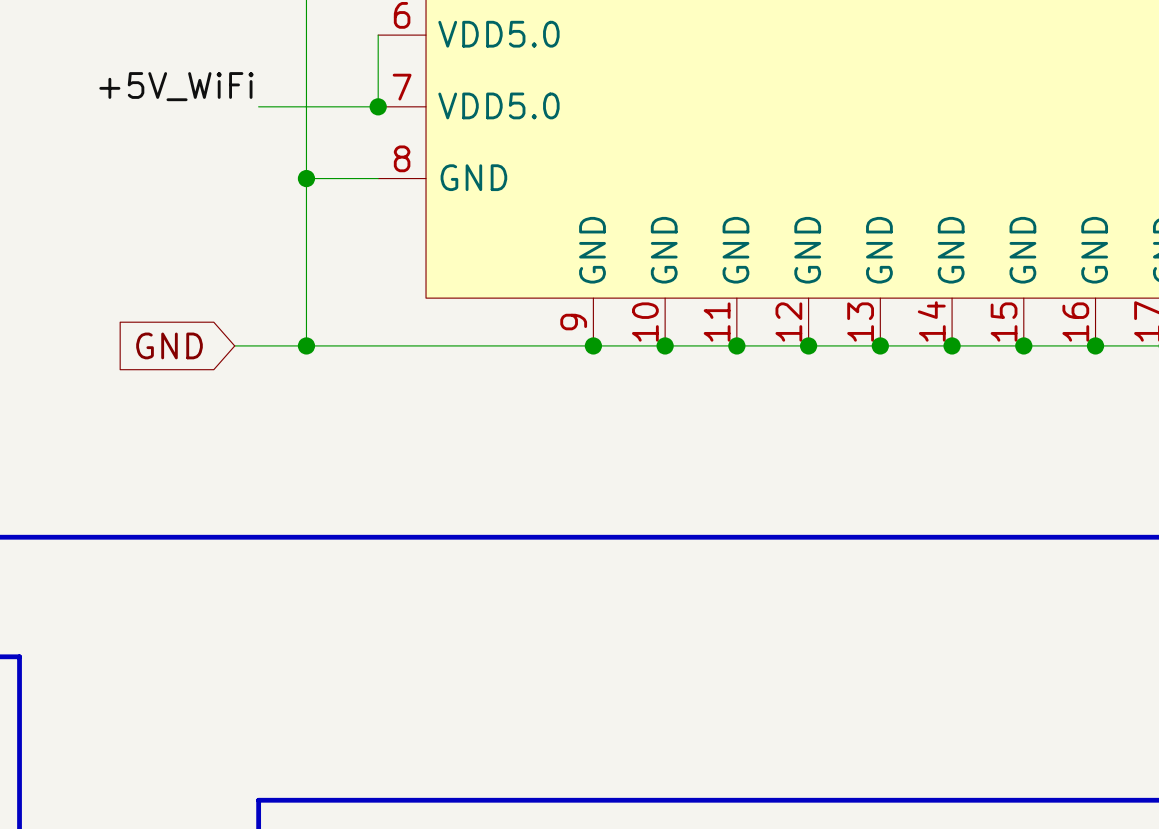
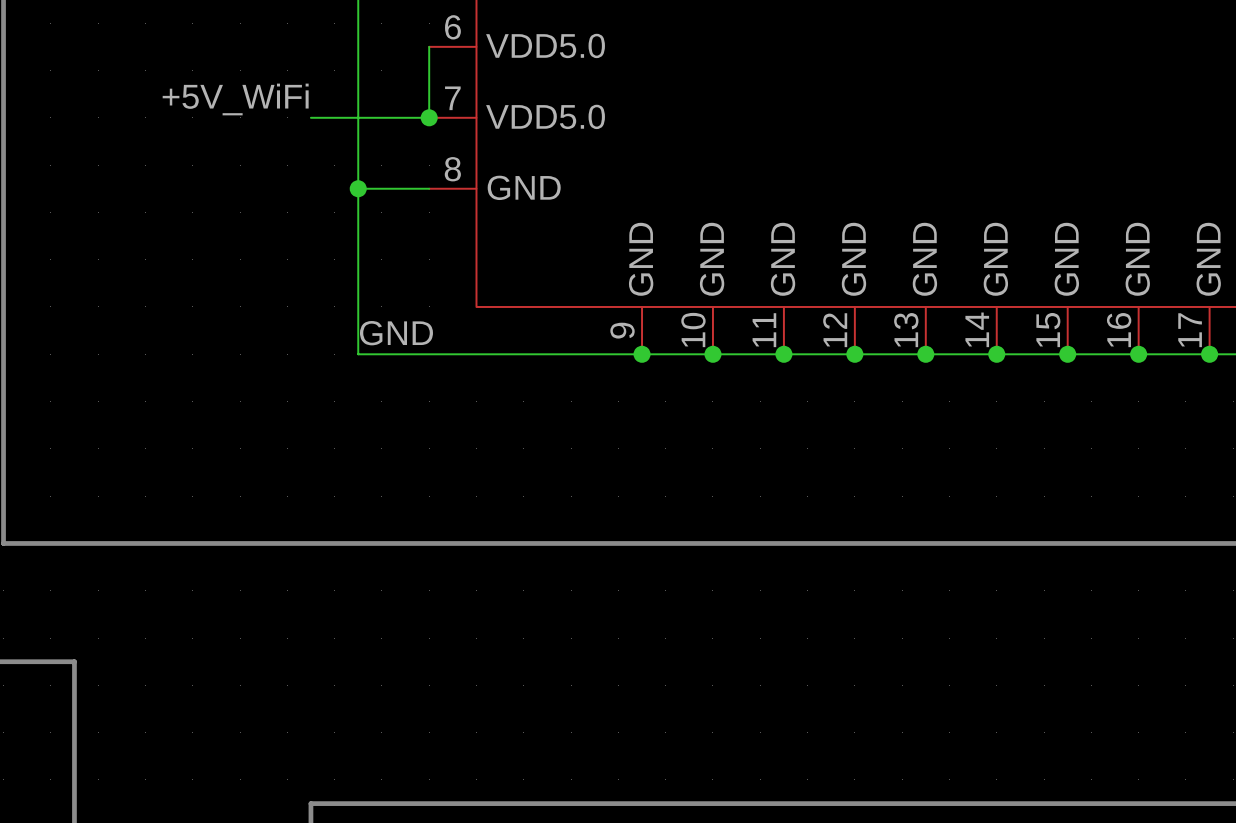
label: none -> GND (396, 333)
global label: GND (169, 345) -> none
wire: (234, 345) (306, 345) -> none
junction: (306, 345) -> none

